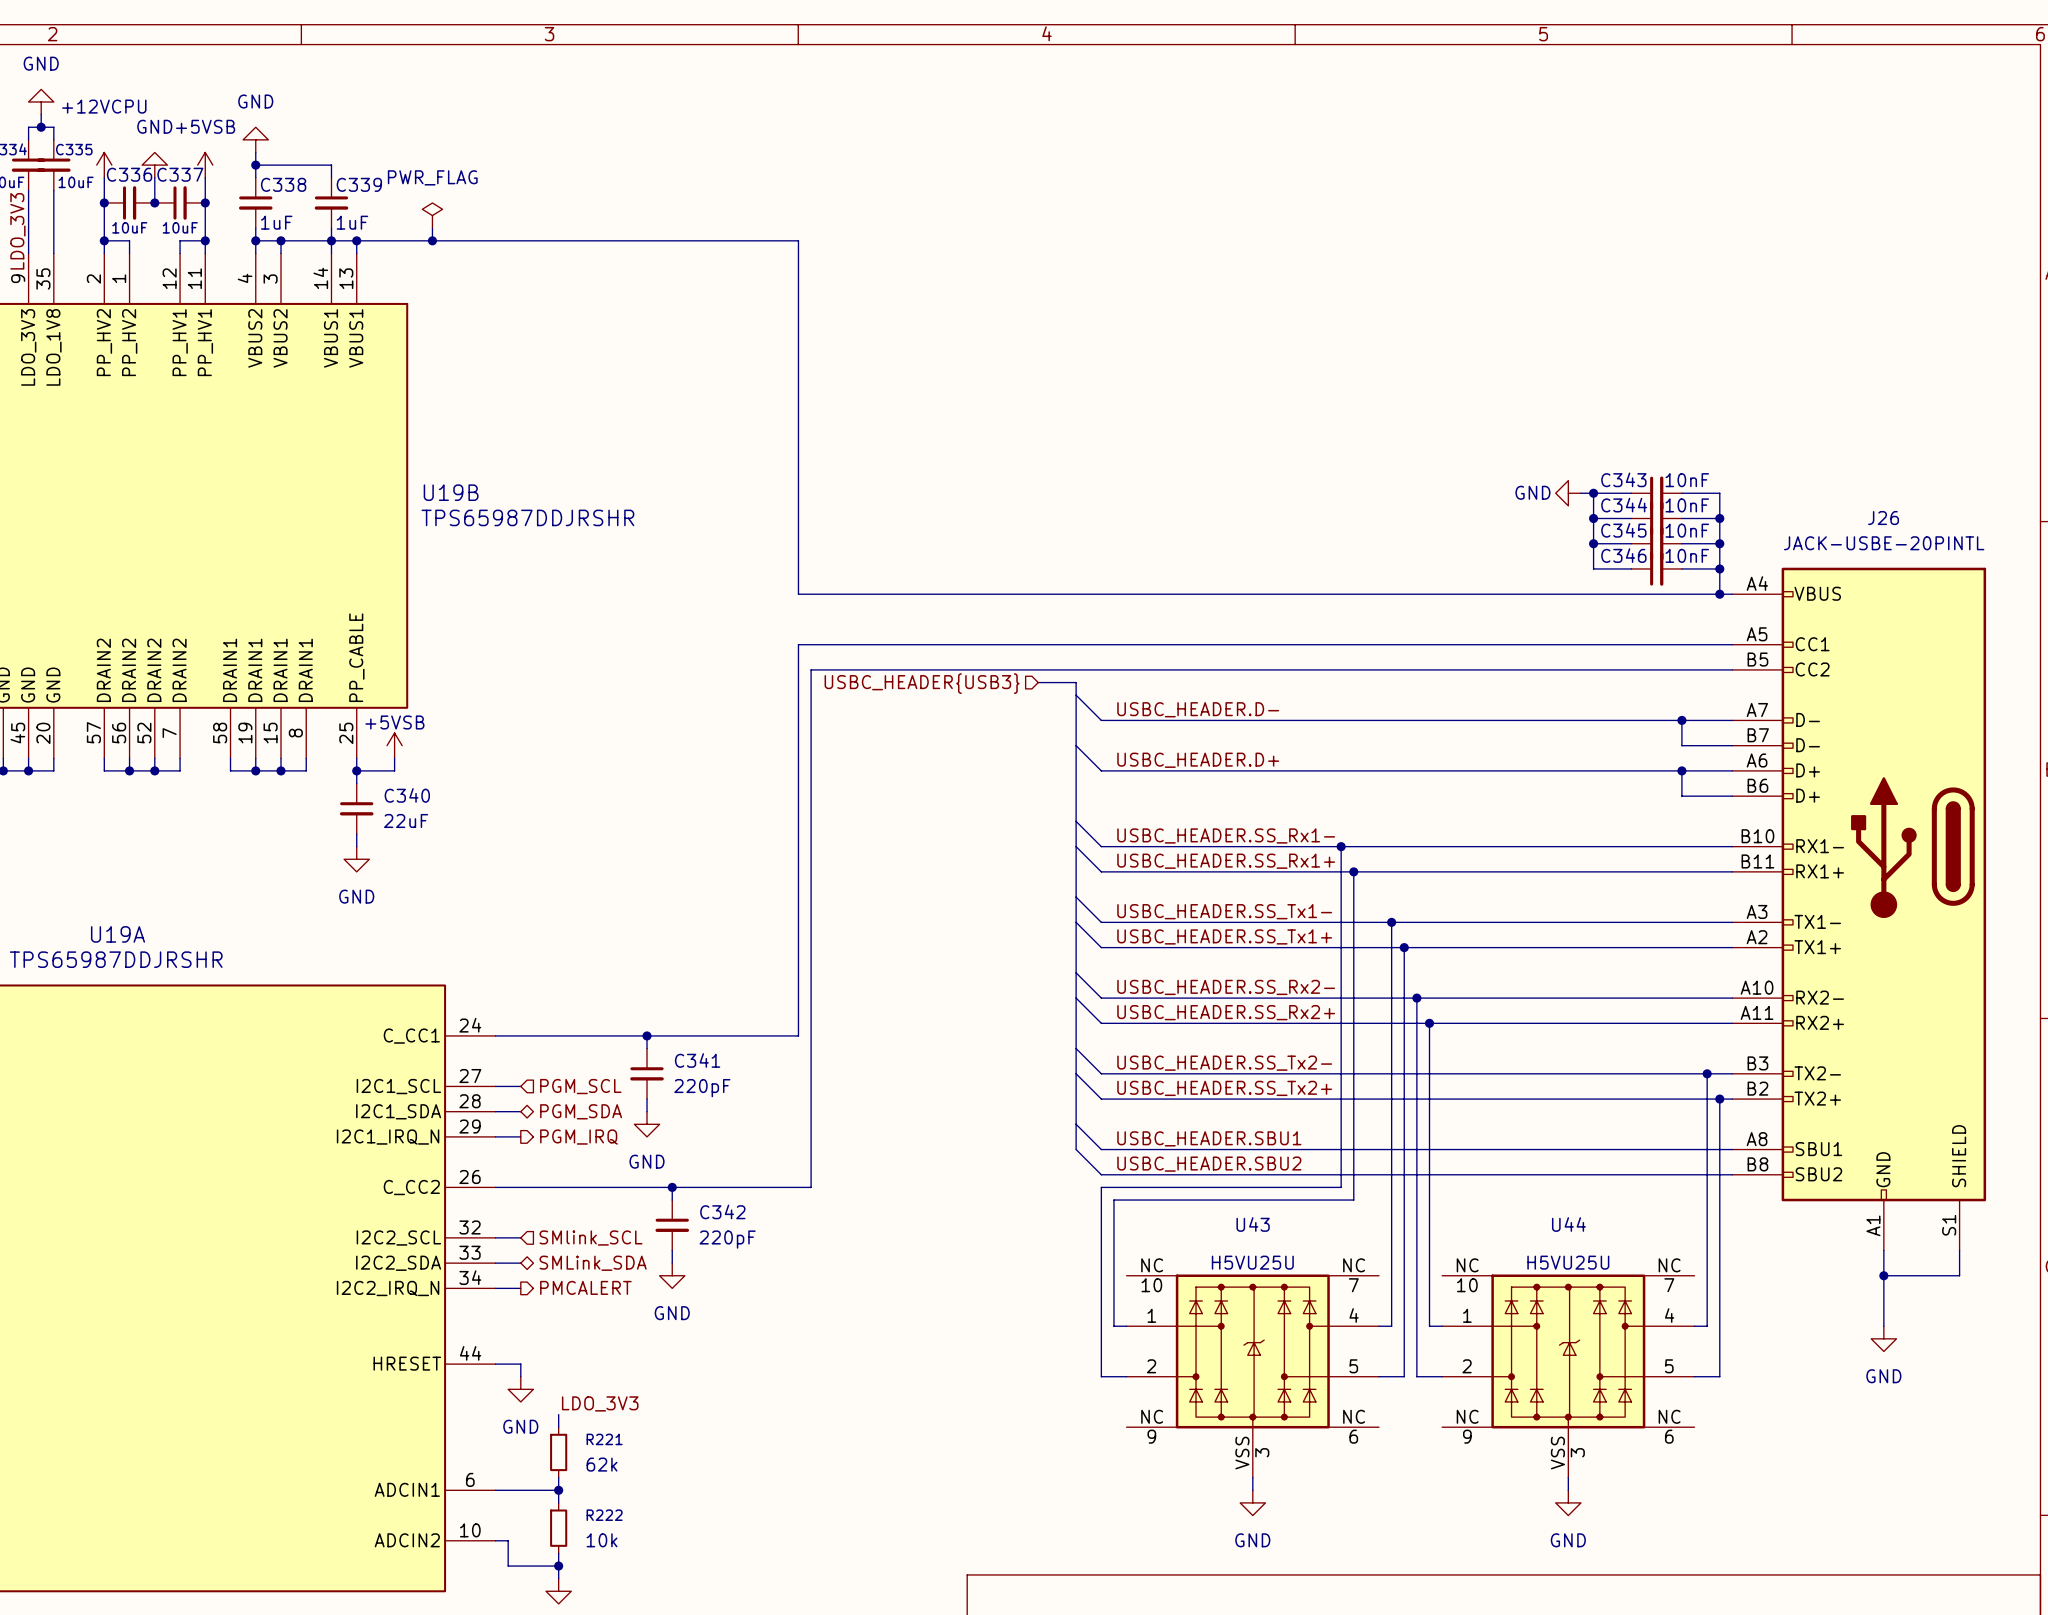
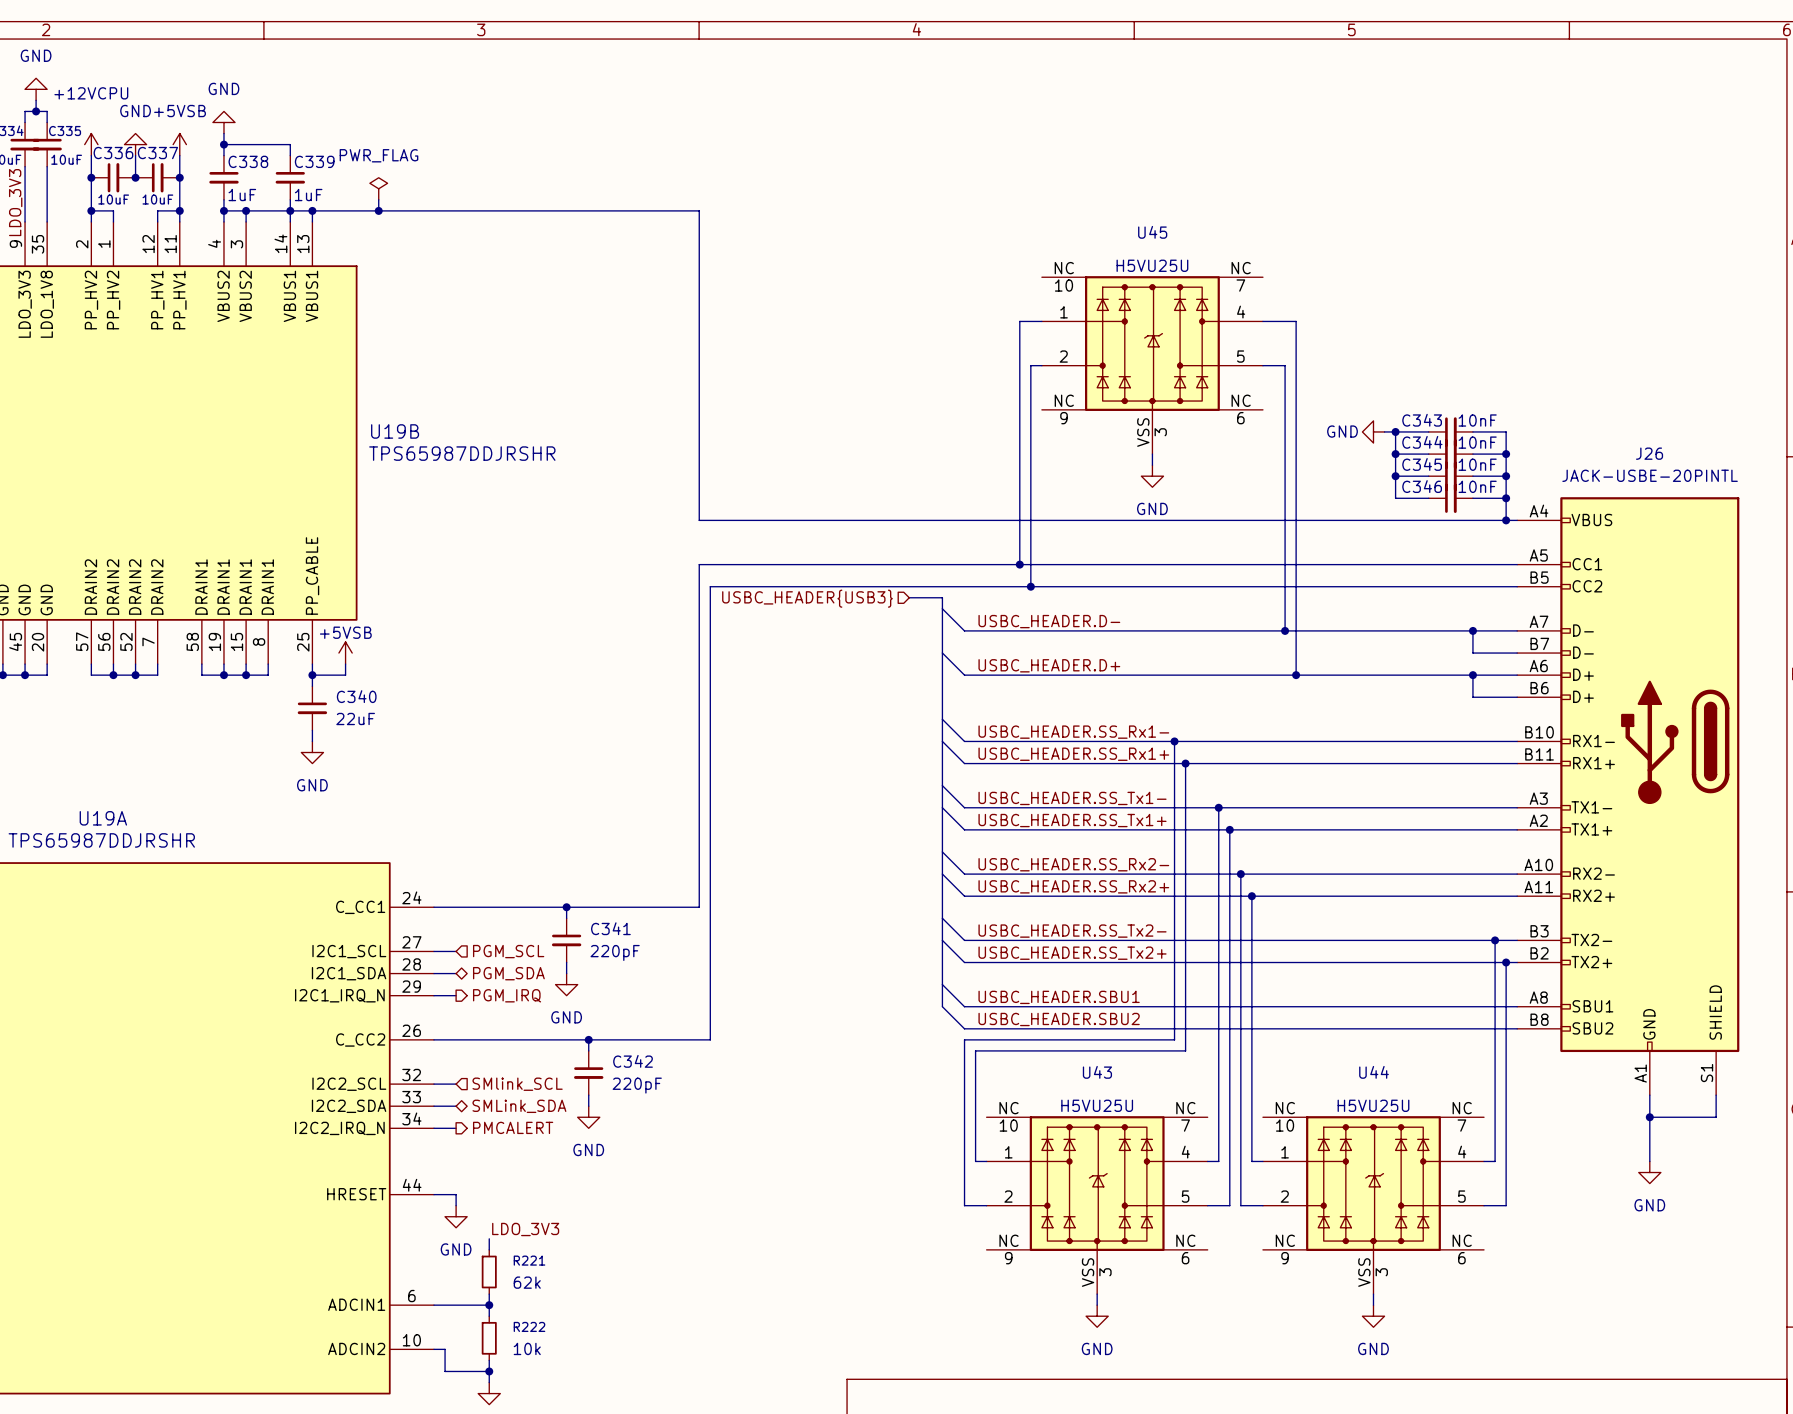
wire: none -> (1041, 321) (1019, 321) (1019, 564)
wire: none -> (1262, 321) (1296, 321) (1296, 675)
U45: none -> H5VU25U (1152, 365)
wire: none -> (1041, 365) (1030, 365) (1030, 586)
wire: none -> (1262, 365) (1285, 365) (1285, 630)
wire: none -> (1152, 454) (1152, 465)
power symbol: none -> GND (1152, 476)
junction: none -> (1019, 564)
junction: none -> (1030, 586)
junction: none -> (1285, 630)
junction: none -> (1296, 675)

